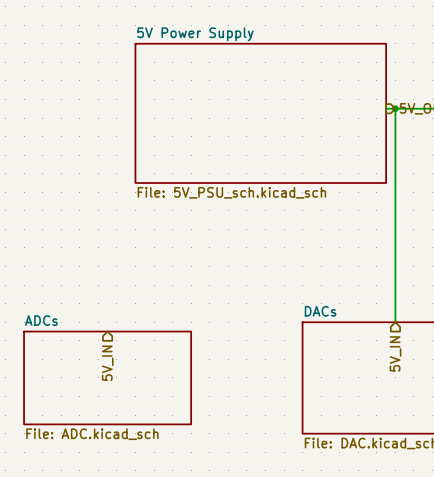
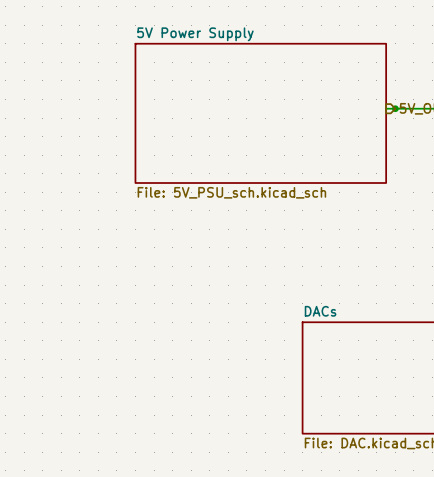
wire: (395, 108) (395, 322) -> none
hierarchical label: 5V_IN (395, 354) -> none
hierarchical label: 5V_IN (107, 363) -> none
sheet ADCs: File: ADC.kicad_sch (107, 377) -> none

